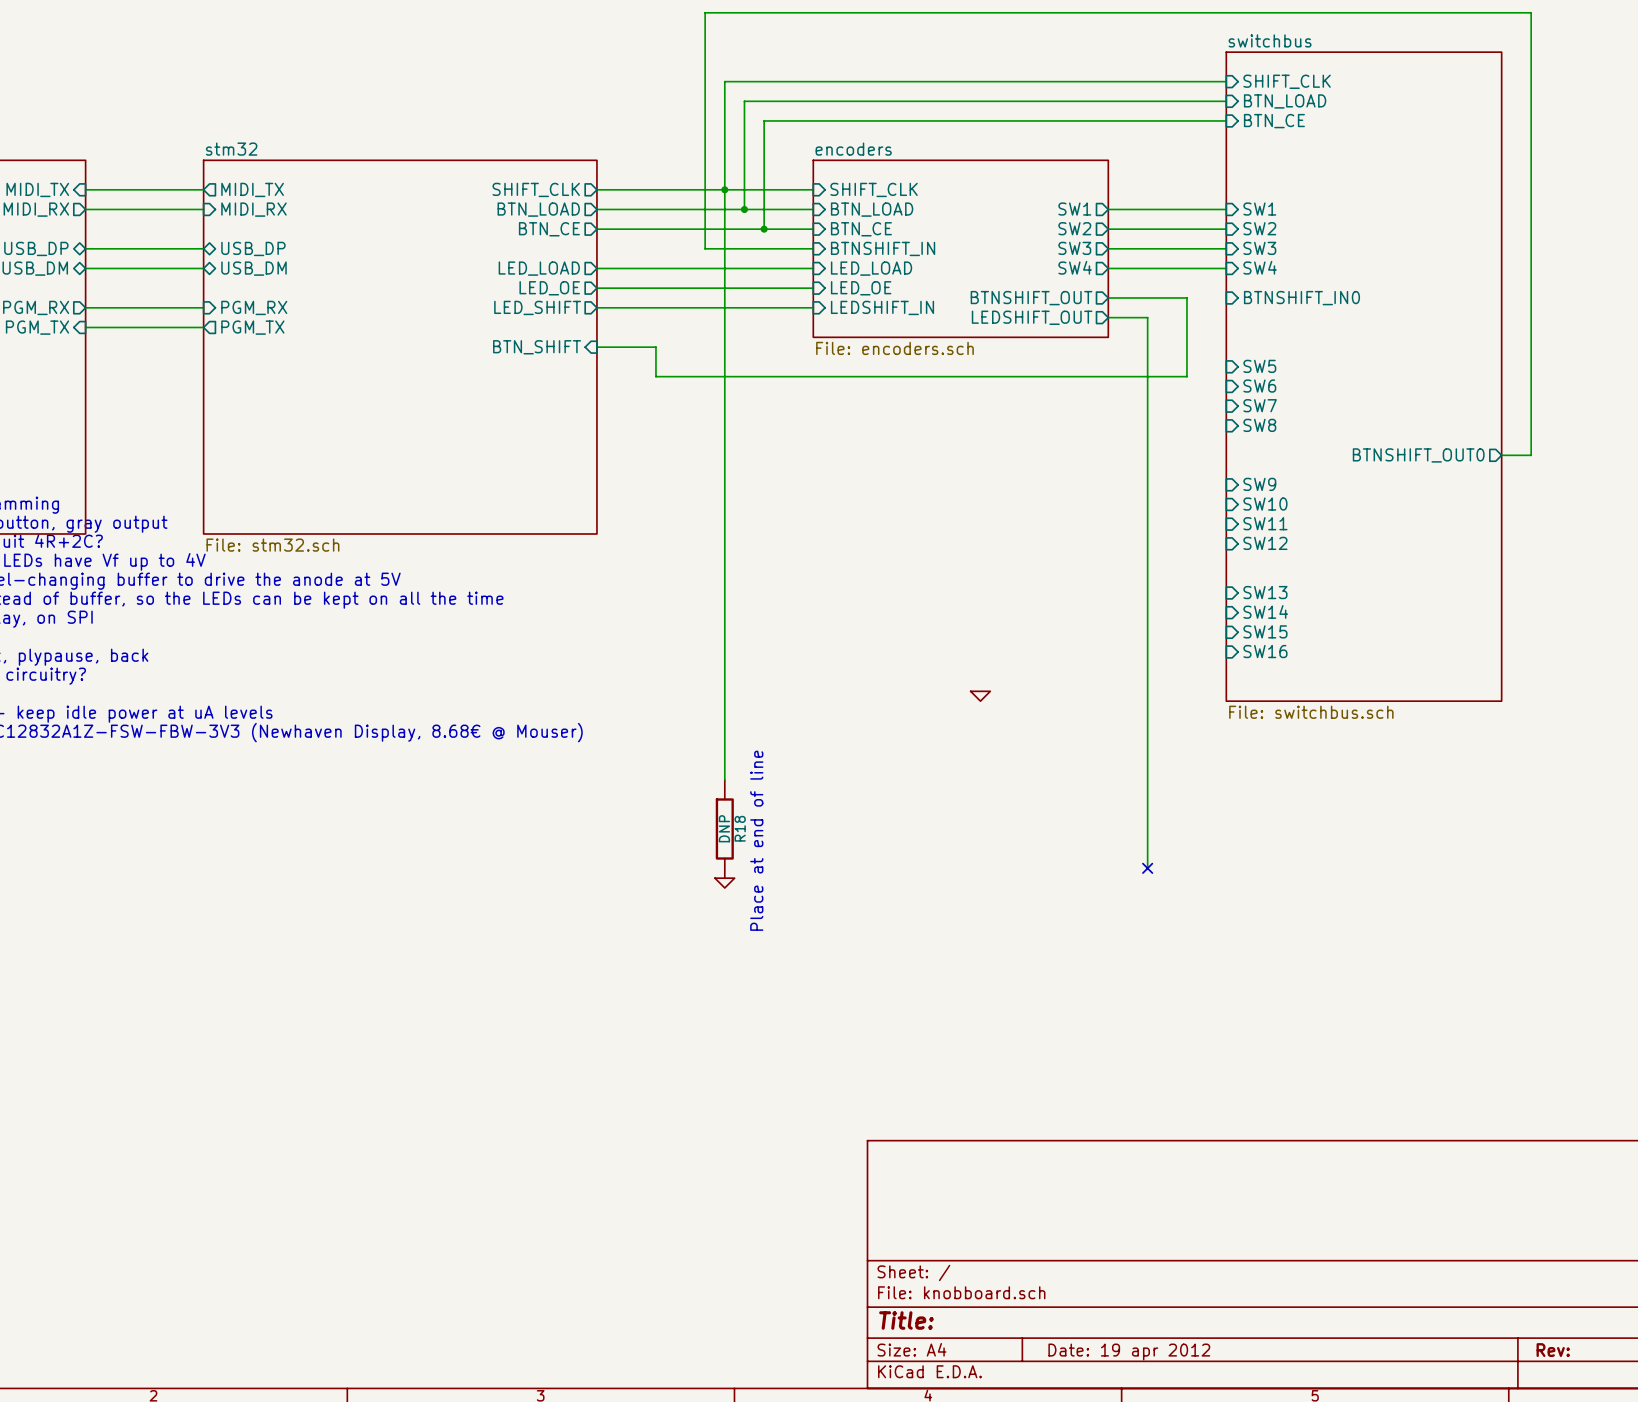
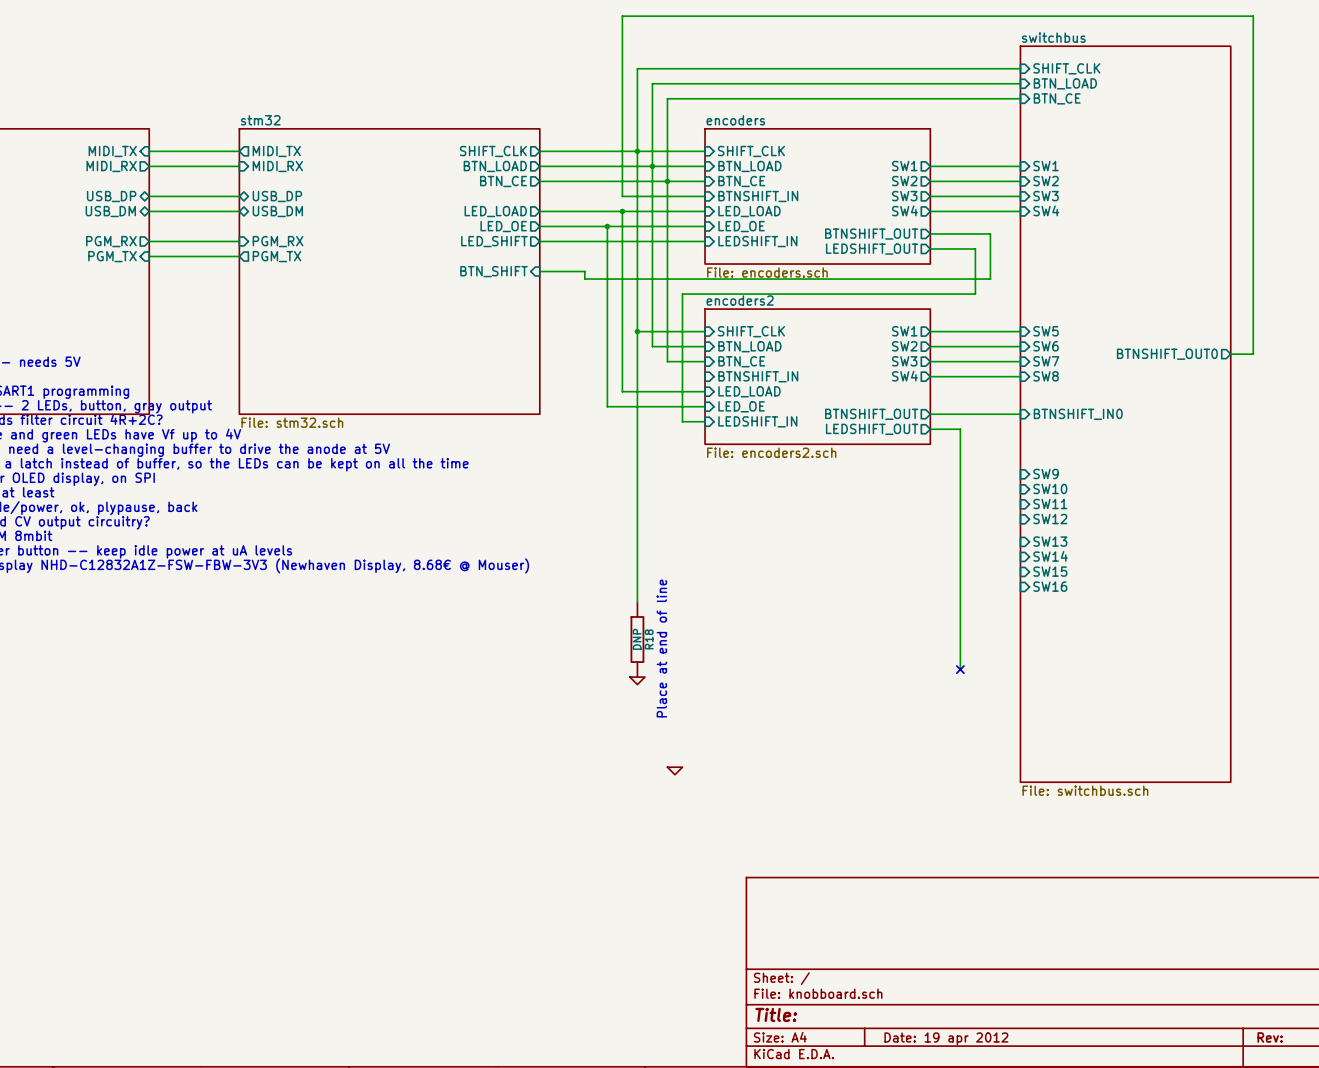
wire: none -> (652, 166) (652, 346) (705, 346)
wire: none -> (667, 181) (667, 361) (705, 361)
wire: none -> (622, 211) (622, 391) (705, 391)
junction: none -> (622, 211)
wire: none -> (607, 226) (607, 406) (705, 406)
junction: none -> (607, 226)
sheet pin: BTNSHIFT_IN0 (1301, 298) -> none
wire: (1147, 317) (1147, 553) -> (930, 429) (960, 429)
wire: (655, 356) (655, 376) (783, 376) -> (705, 421) (682, 421) (682, 294)
wire: none -> (584, 279) (990, 279)
wire: (1186, 356) (1186, 376) (1167, 376) -> (960, 248) (975, 248) (975, 294)
sheet pin: SW5 (1259, 366) -> none
sheet switchbus: File: switchbus.sch (1363, 376) -> none
sheet pin position: SW6 (1259, 386) -> SW6 (1046, 346)
sheet pin position: SW7 (1260, 405) -> SW7 (1046, 361)
wire: none -> (637, 331) (705, 331)
junction: none -> (637, 331)
sheet pin: none -> SHIFT_CLK (751, 331)
sheet pin: none -> SW1 (904, 331)
wire: none -> (930, 331) (1020, 331)
sheet pin: SW8 (1259, 425) -> SW5 (1046, 331)
sheet pin: none -> BTN_LOAD (749, 346)
sheet pin: none -> SW2 (904, 346)
wire: none -> (930, 346) (1020, 346)
sheet pin: none -> SW3 (904, 361)
sheet pin: none -> BTN_CE (741, 361)
wire: none -> (930, 361) (1020, 361)
sheet pin: none -> BTNSHIFT_IN (758, 376)
sheet encoders2: none -> File: encoders2.sch (817, 376)
sheet pin: none -> SW4 (904, 376)
wire: none -> (930, 376) (1020, 376)
sheet pin: SW9 (1259, 484) -> SW8 (1046, 376)
sheet pin: none -> LED_LOAD (749, 391)
sheet pin: SW10 (1265, 504) -> none
sheet pin: SW11 (1265, 523) -> none
sheet pin: none -> LED_OE (741, 406)
wire: none -> (930, 414) (1020, 414)
sheet switchbus: none -> File: switchbus.sch (1125, 414)
sheet pin: none -> BTNSHIFT_OUT (871, 414)
sheet pin: none -> BTNSHIFT_IN0 (1078, 414)
sheet pin: none -> LEDSHIFT_IN (757, 421)
sheet pin position: SW12 (1265, 543) -> SW12 (1050, 519)
sheet pin: none -> LEDSHIFT_OUT (872, 429)
sheet pin position: SW13 (1265, 592) -> SW13 (1050, 541)
sheet pin: SW14 (1265, 611) -> SW9 (1046, 473)
sheet pin: SW15 (1265, 631) -> SW10 (1050, 488)
sheet pin: SW16 (1265, 651) -> SW11 (1050, 504)
power symbol: (980, 696) -> none
sheet pin: none -> SW14 (1050, 556)
sheet pin: none -> SW15 (1050, 571)
sheet pin: none -> SW16 (1050, 586)
power symbol: none -> (674, 770)

